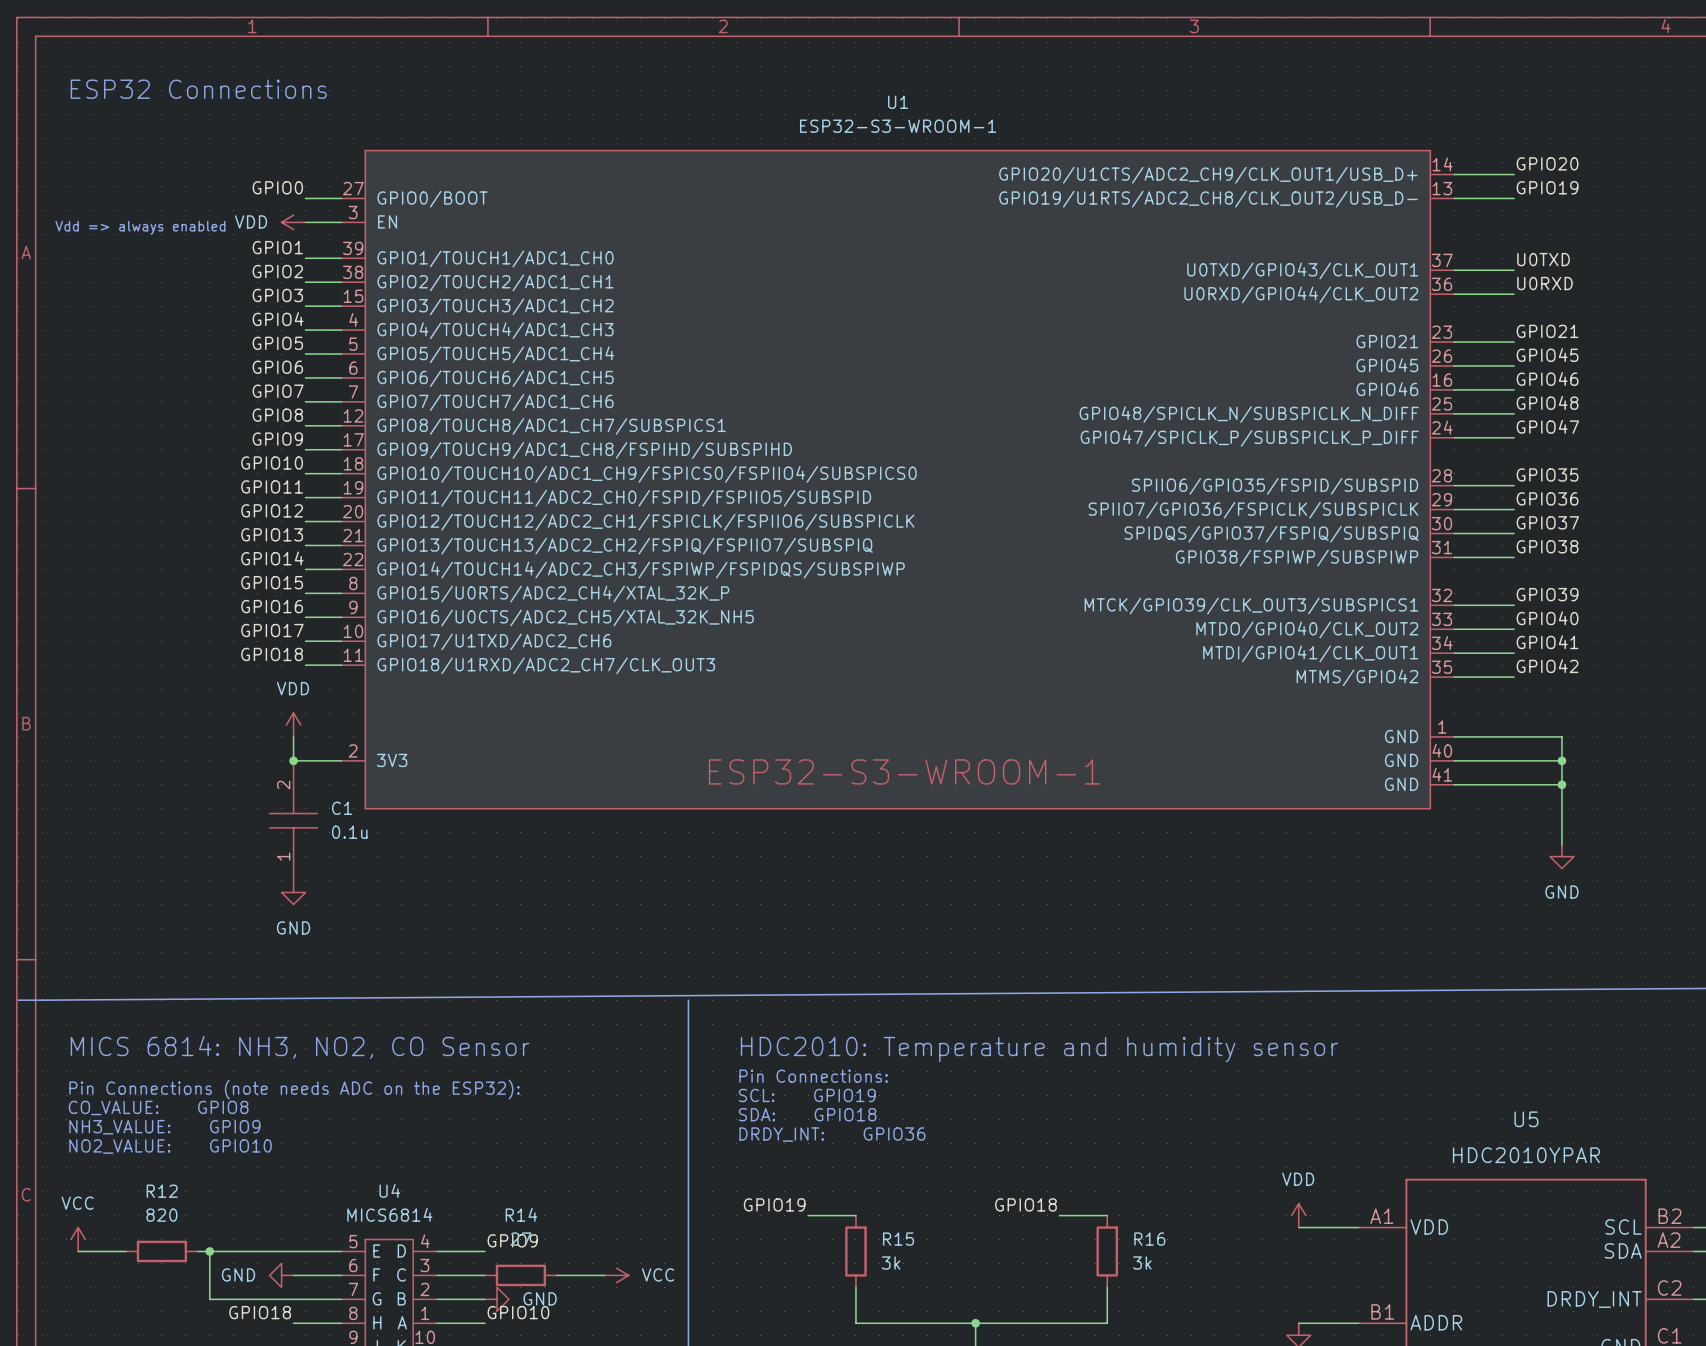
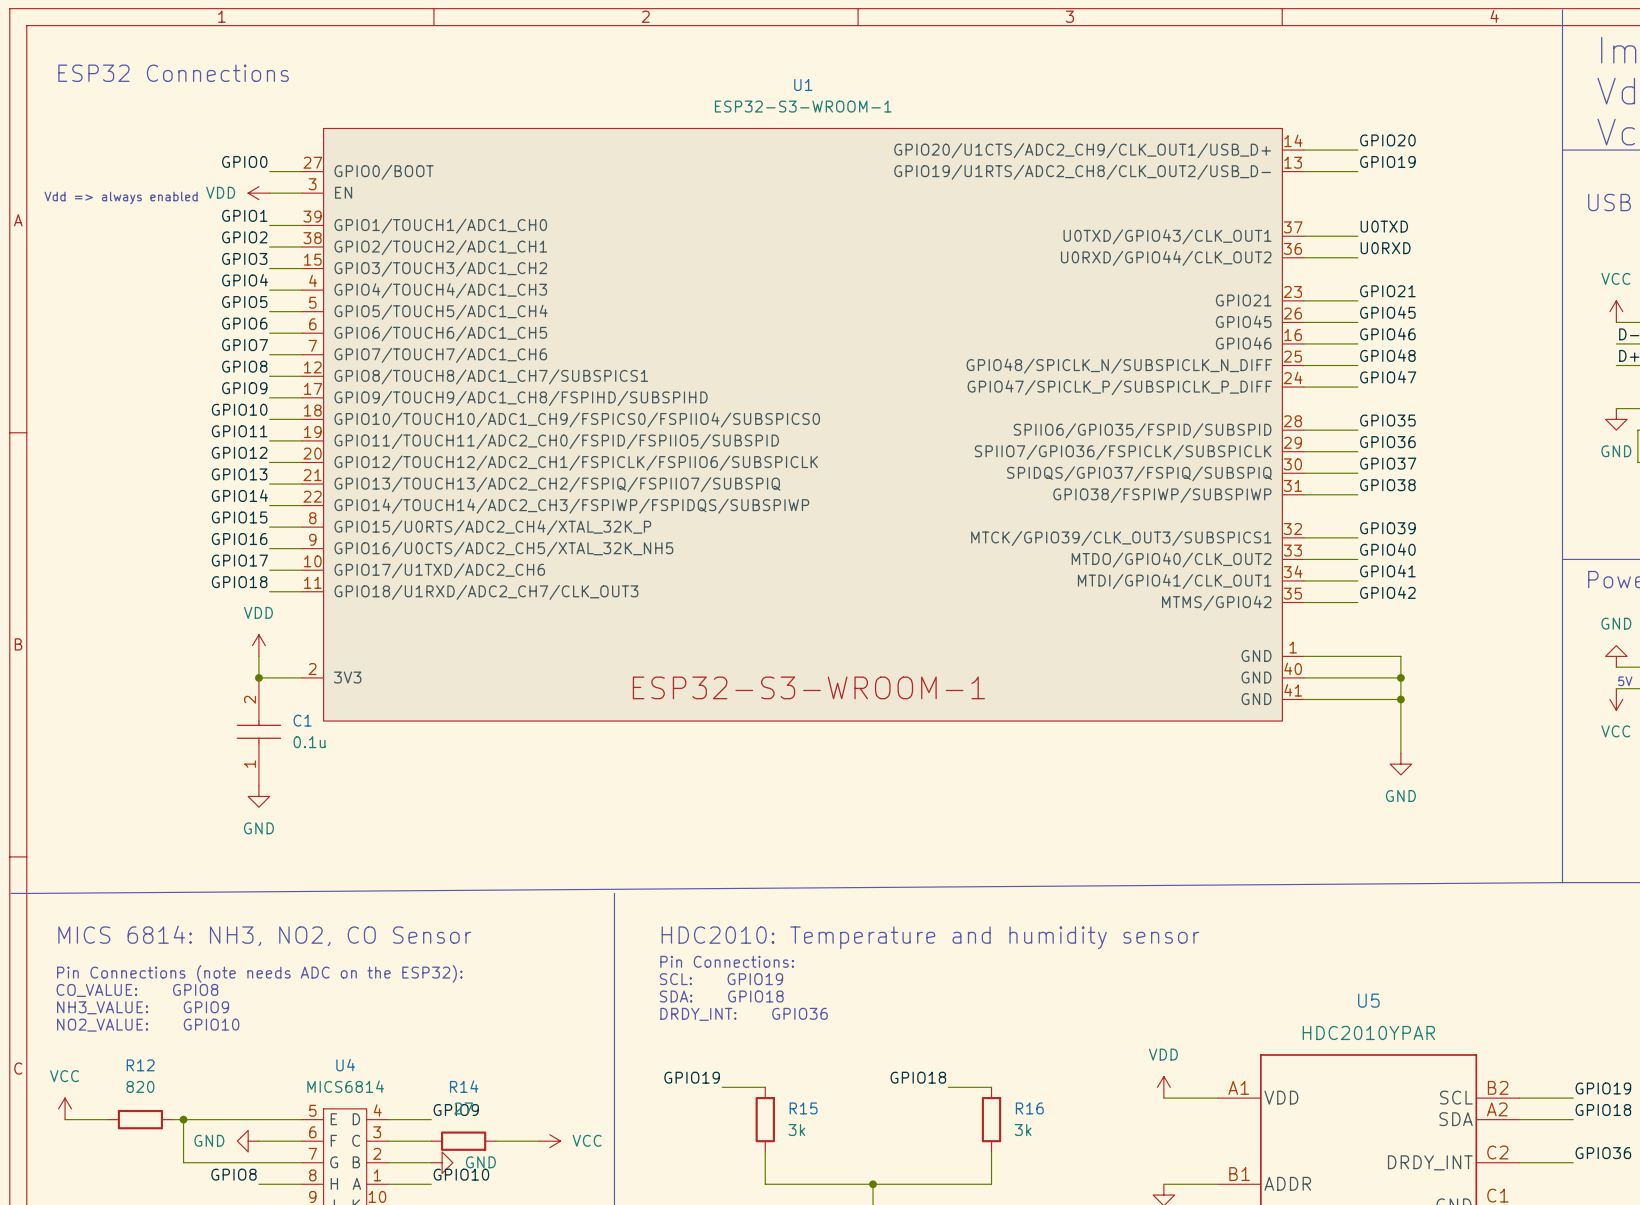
label: GPIO18 (260, 1312) -> GPIO8 (233, 1174)

